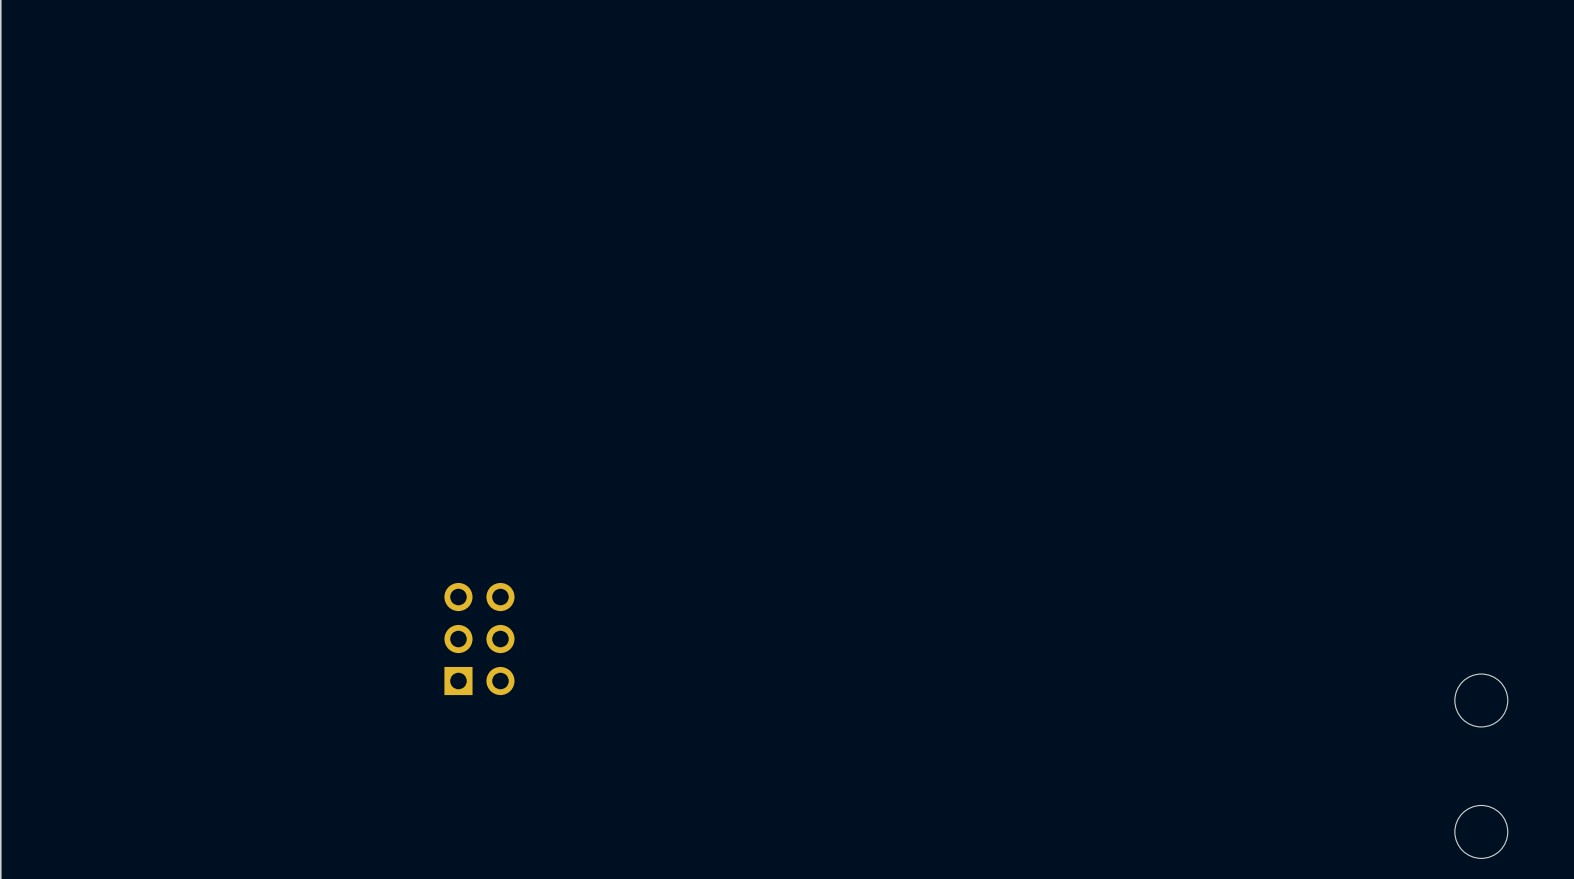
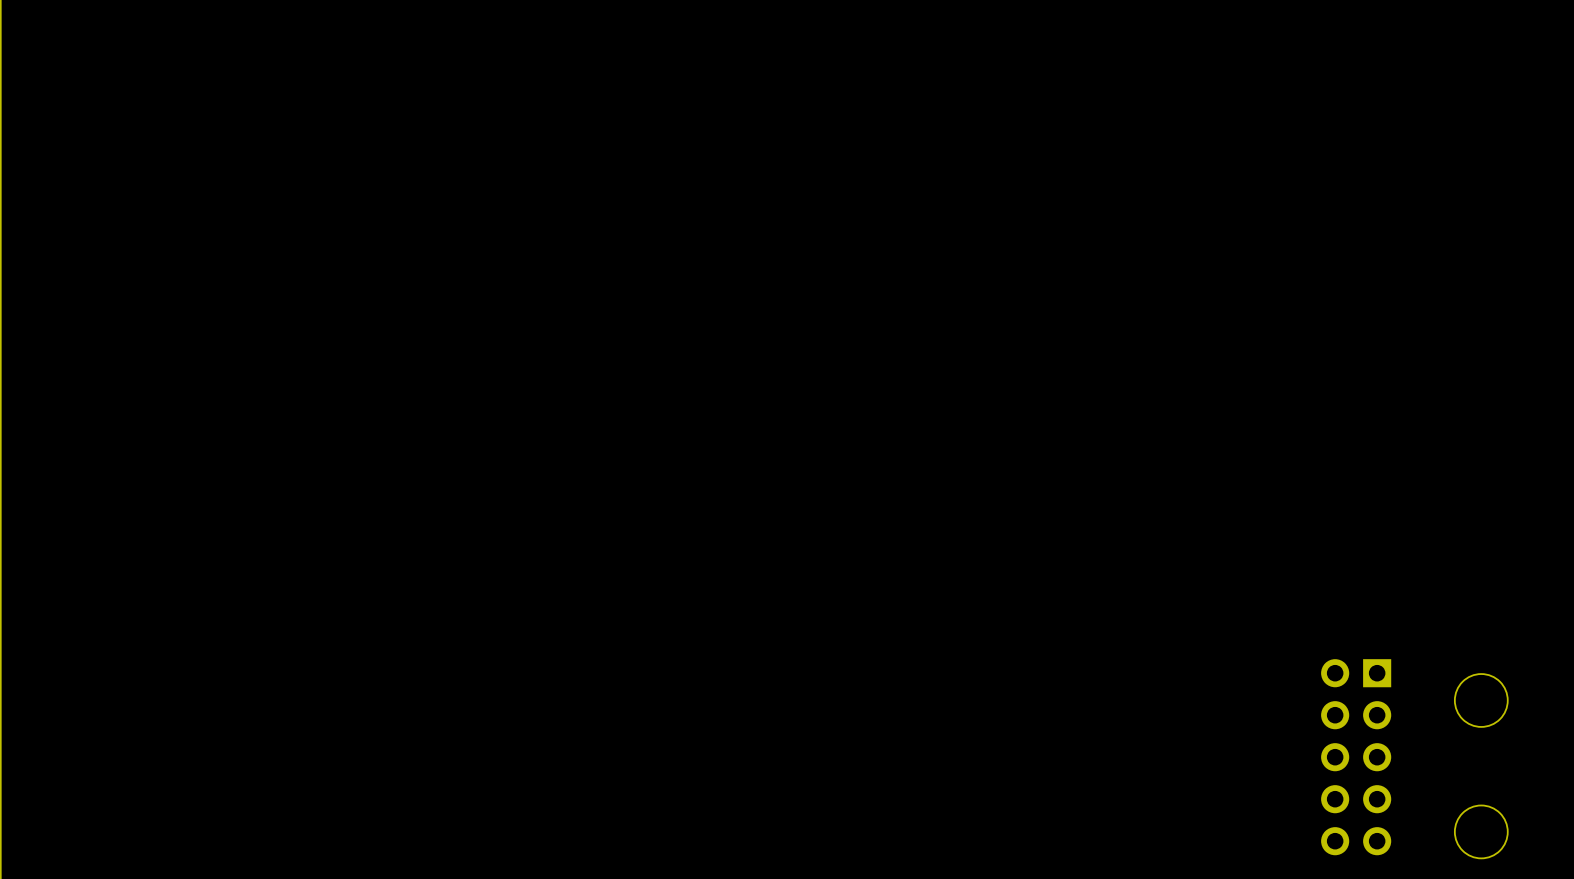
part: (479, 639) -> none
part: none -> (1356, 757)

